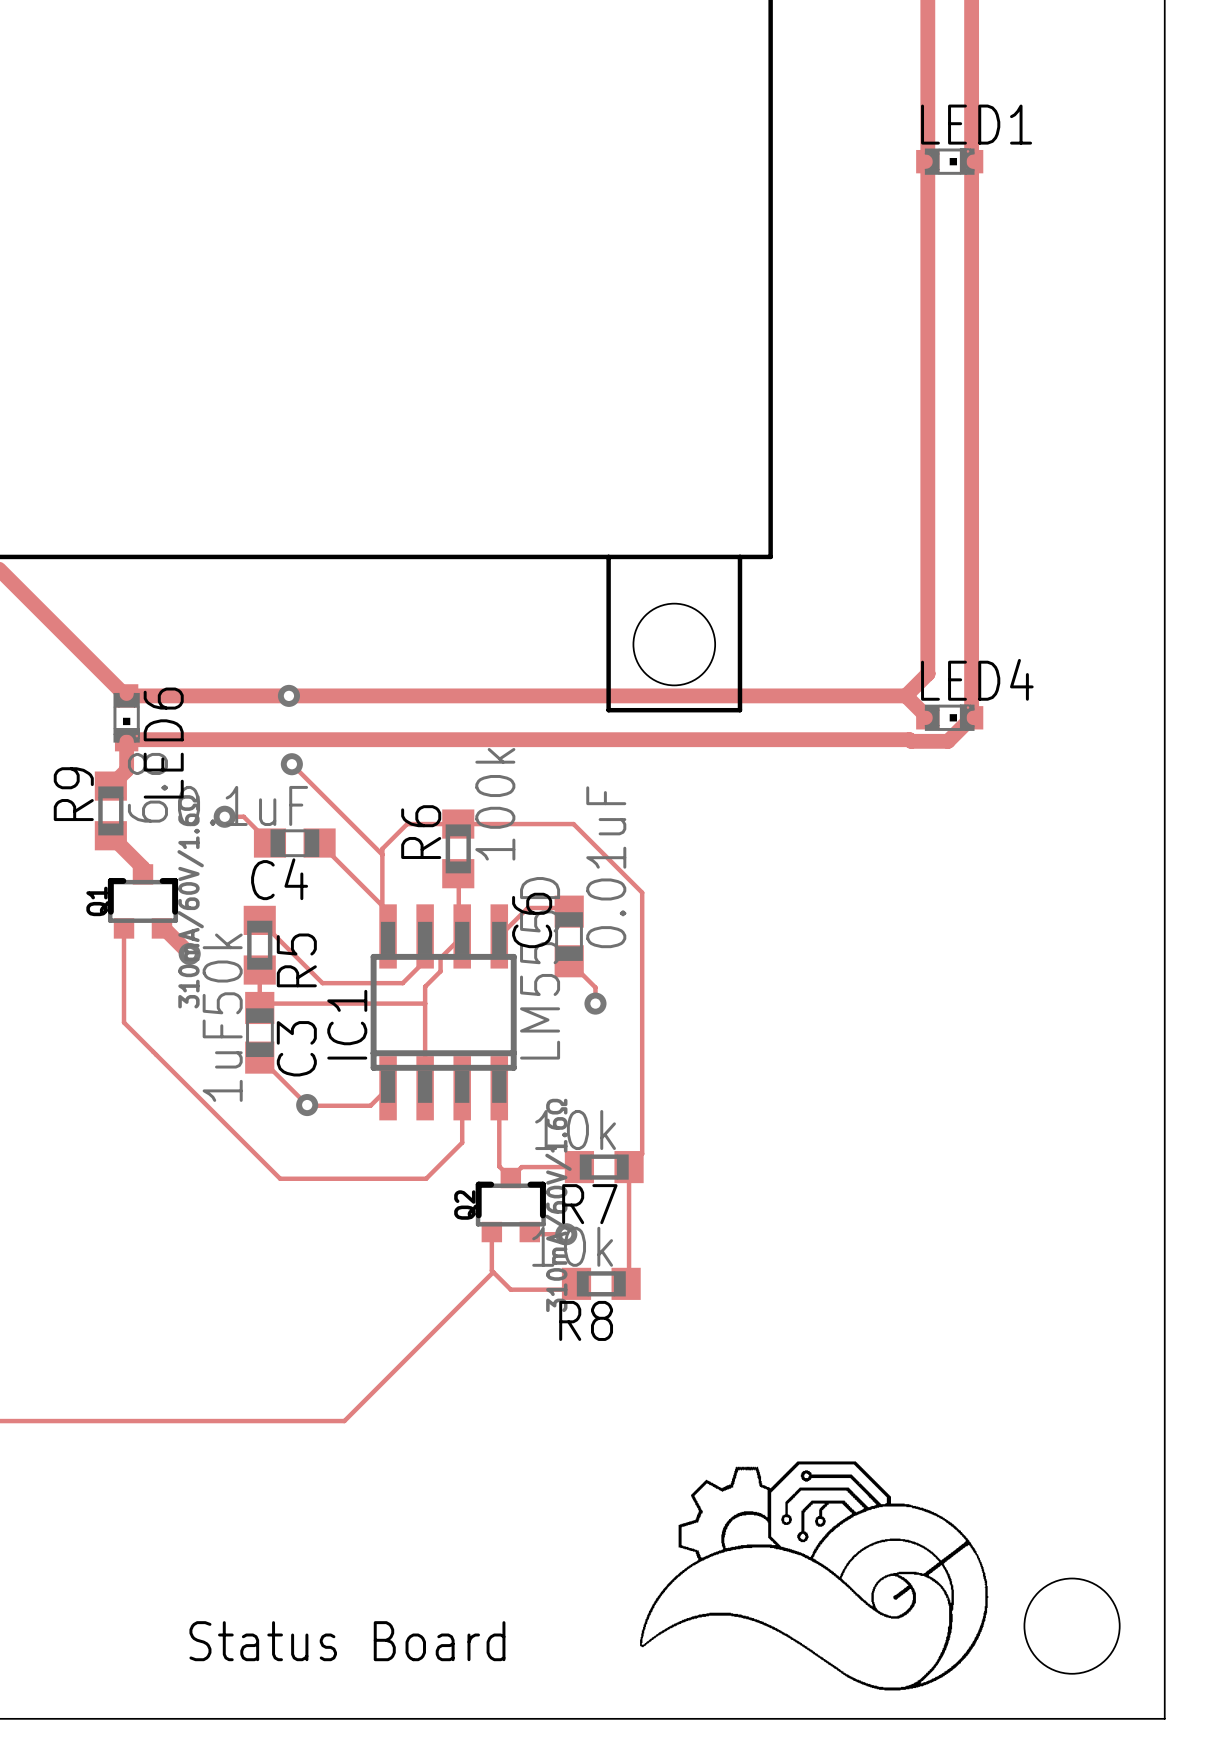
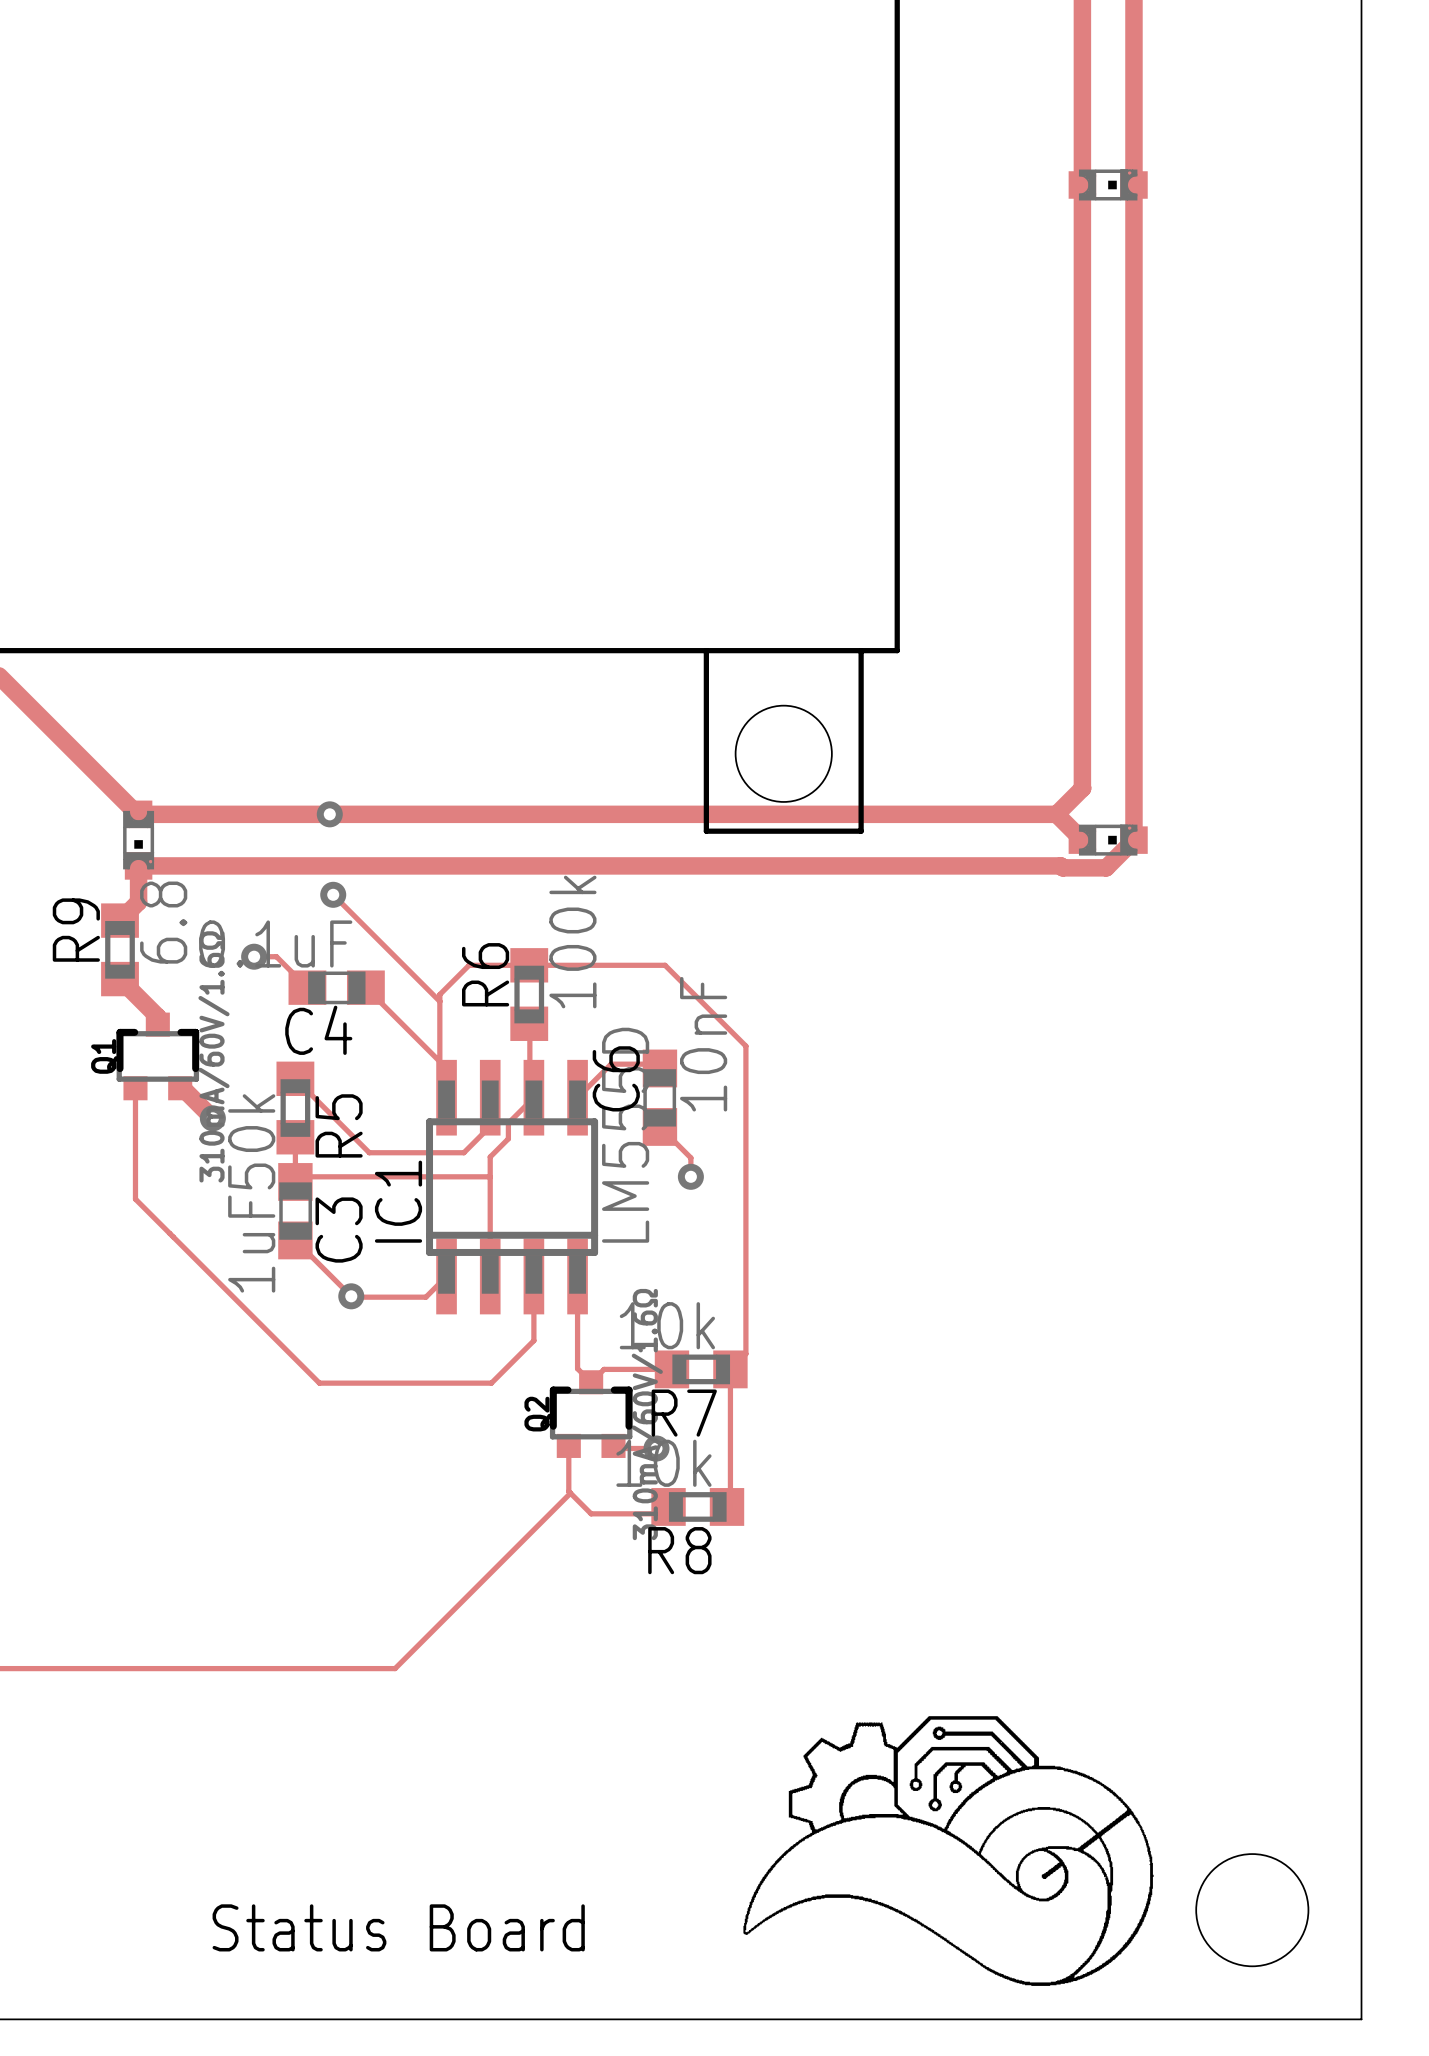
LED1 name: LED1 (976, 124) -> none
LED4 name: LED4 (977, 679) -> none
LED6 name: LED6 (163, 743) -> none
C6 value: 0.01uF (606, 867) -> 10nF (703, 1044)

